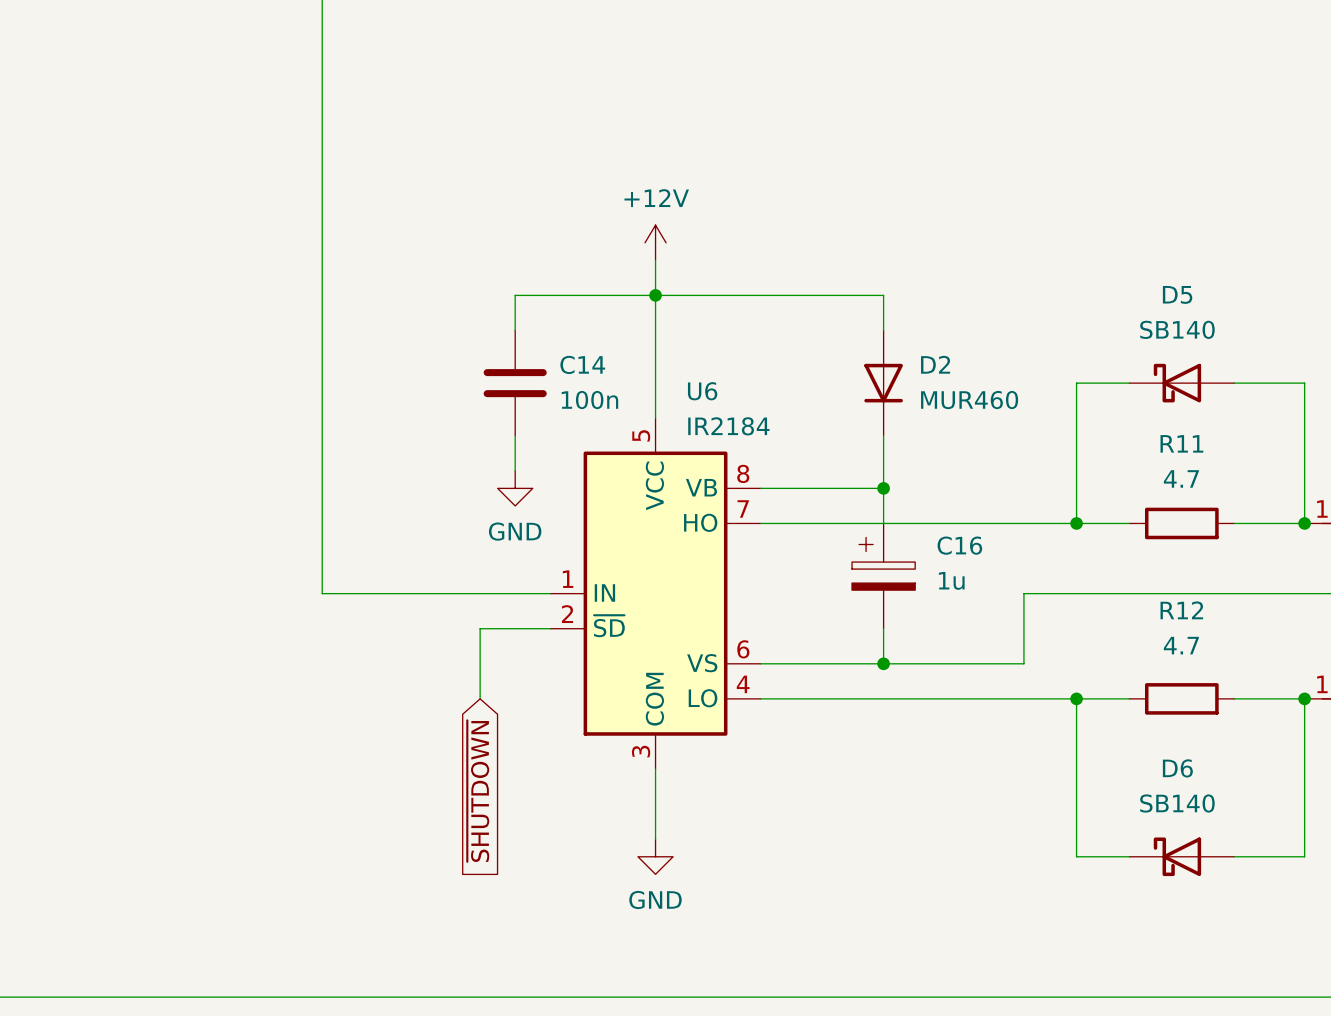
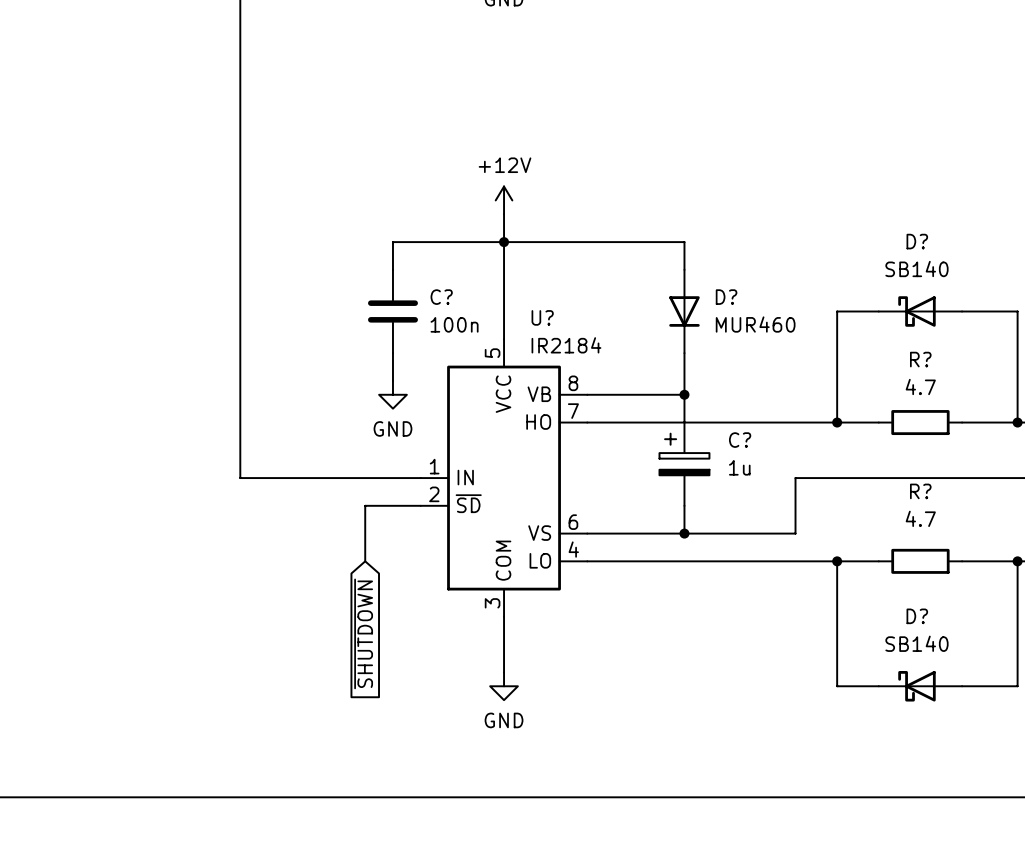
D5 name: D5 (1177, 294) -> D? (917, 241)
C14 name: C14 (582, 364) -> C? (441, 297)
D2 name: D2 (935, 364) -> D? (726, 297)
U6 name: U6 (702, 391) -> U? (542, 317)
R11 name: R11 (1181, 443) -> R? (920, 359)
C16 name: C16 (959, 545) -> C? (740, 440)
R12 name: R12 (1181, 610) -> R? (920, 491)
D6 name: D6 (1177, 768) -> D? (917, 616)

